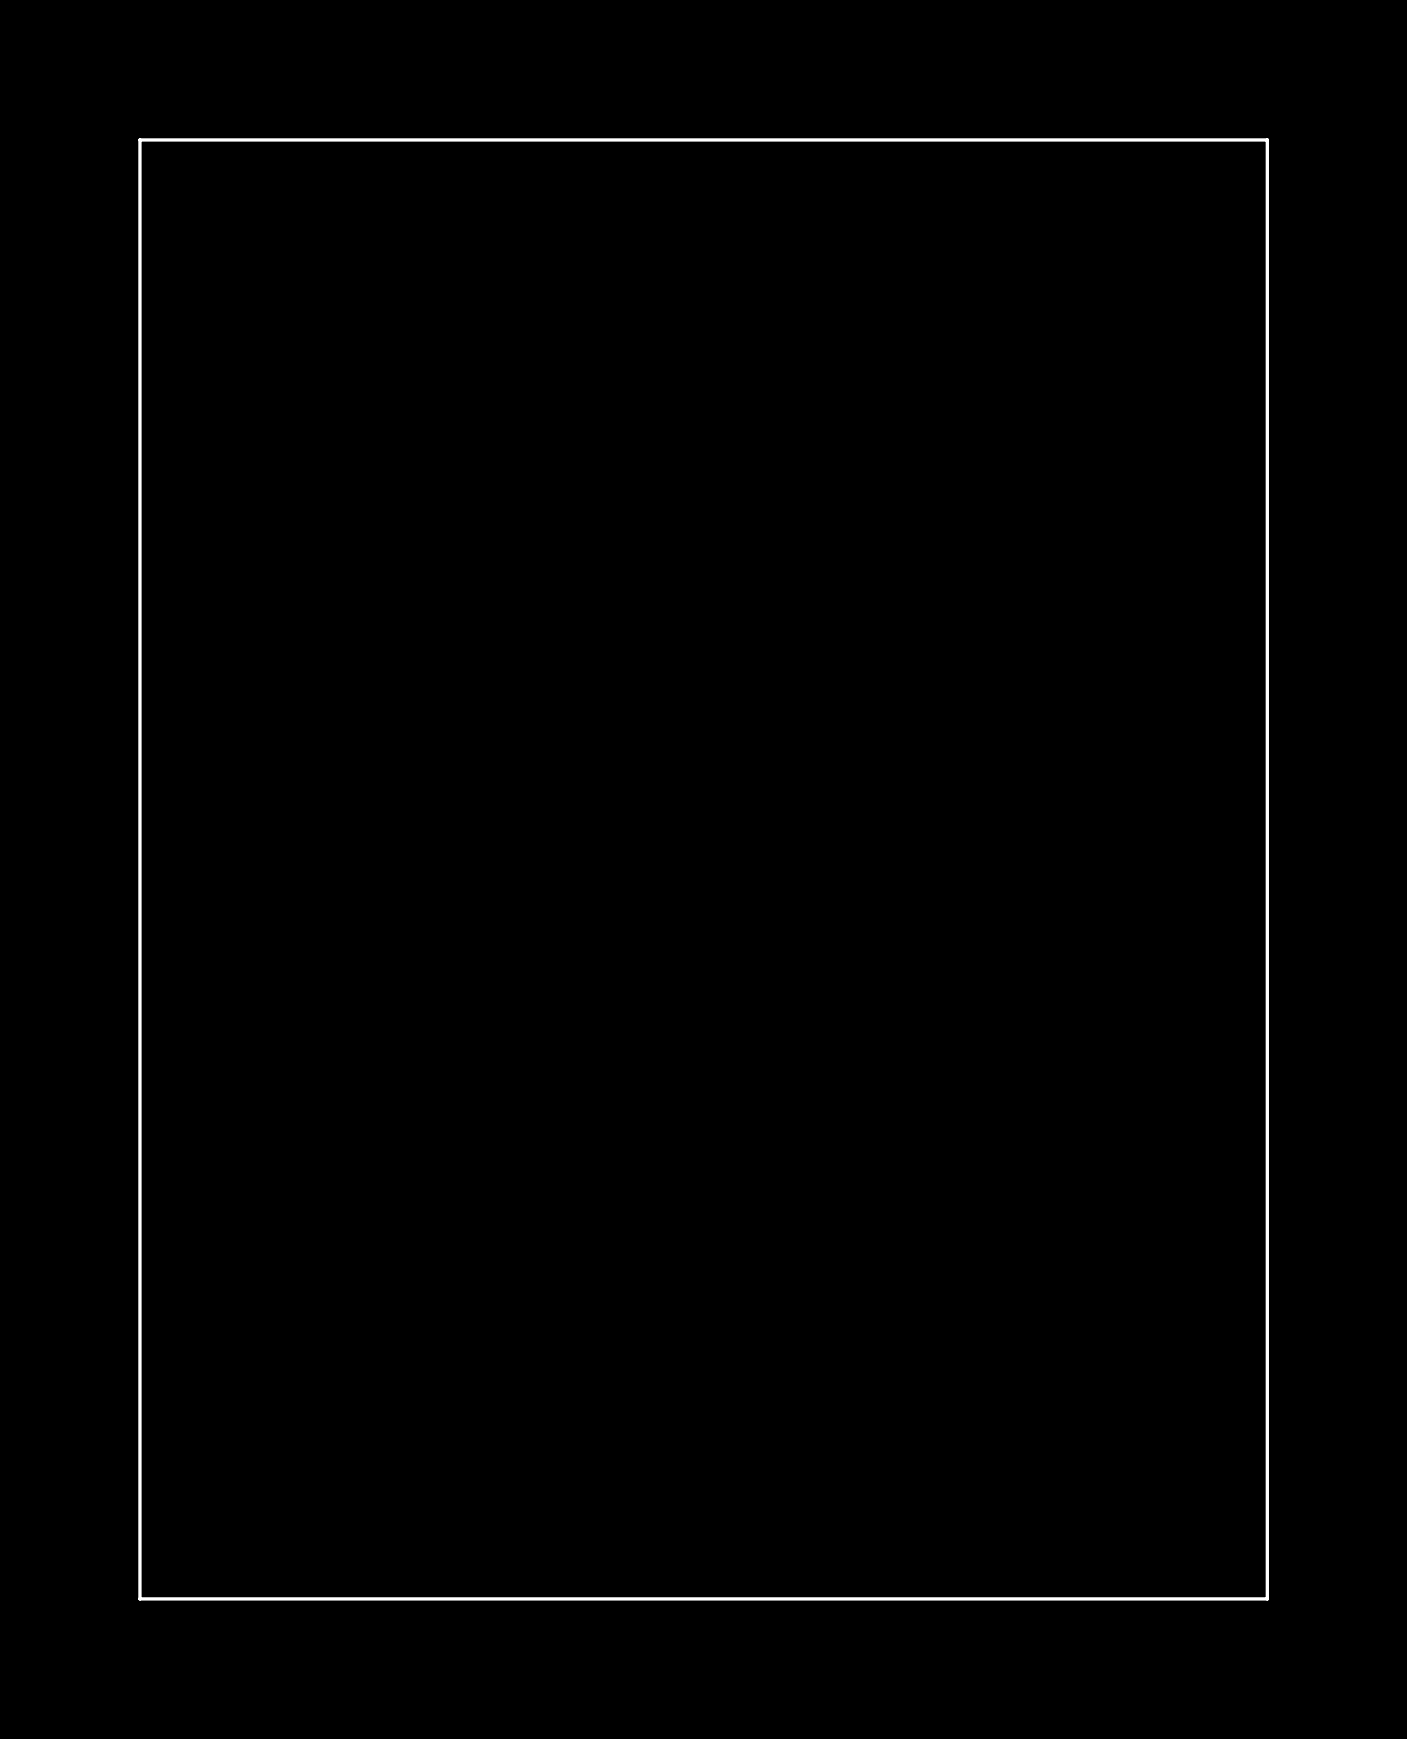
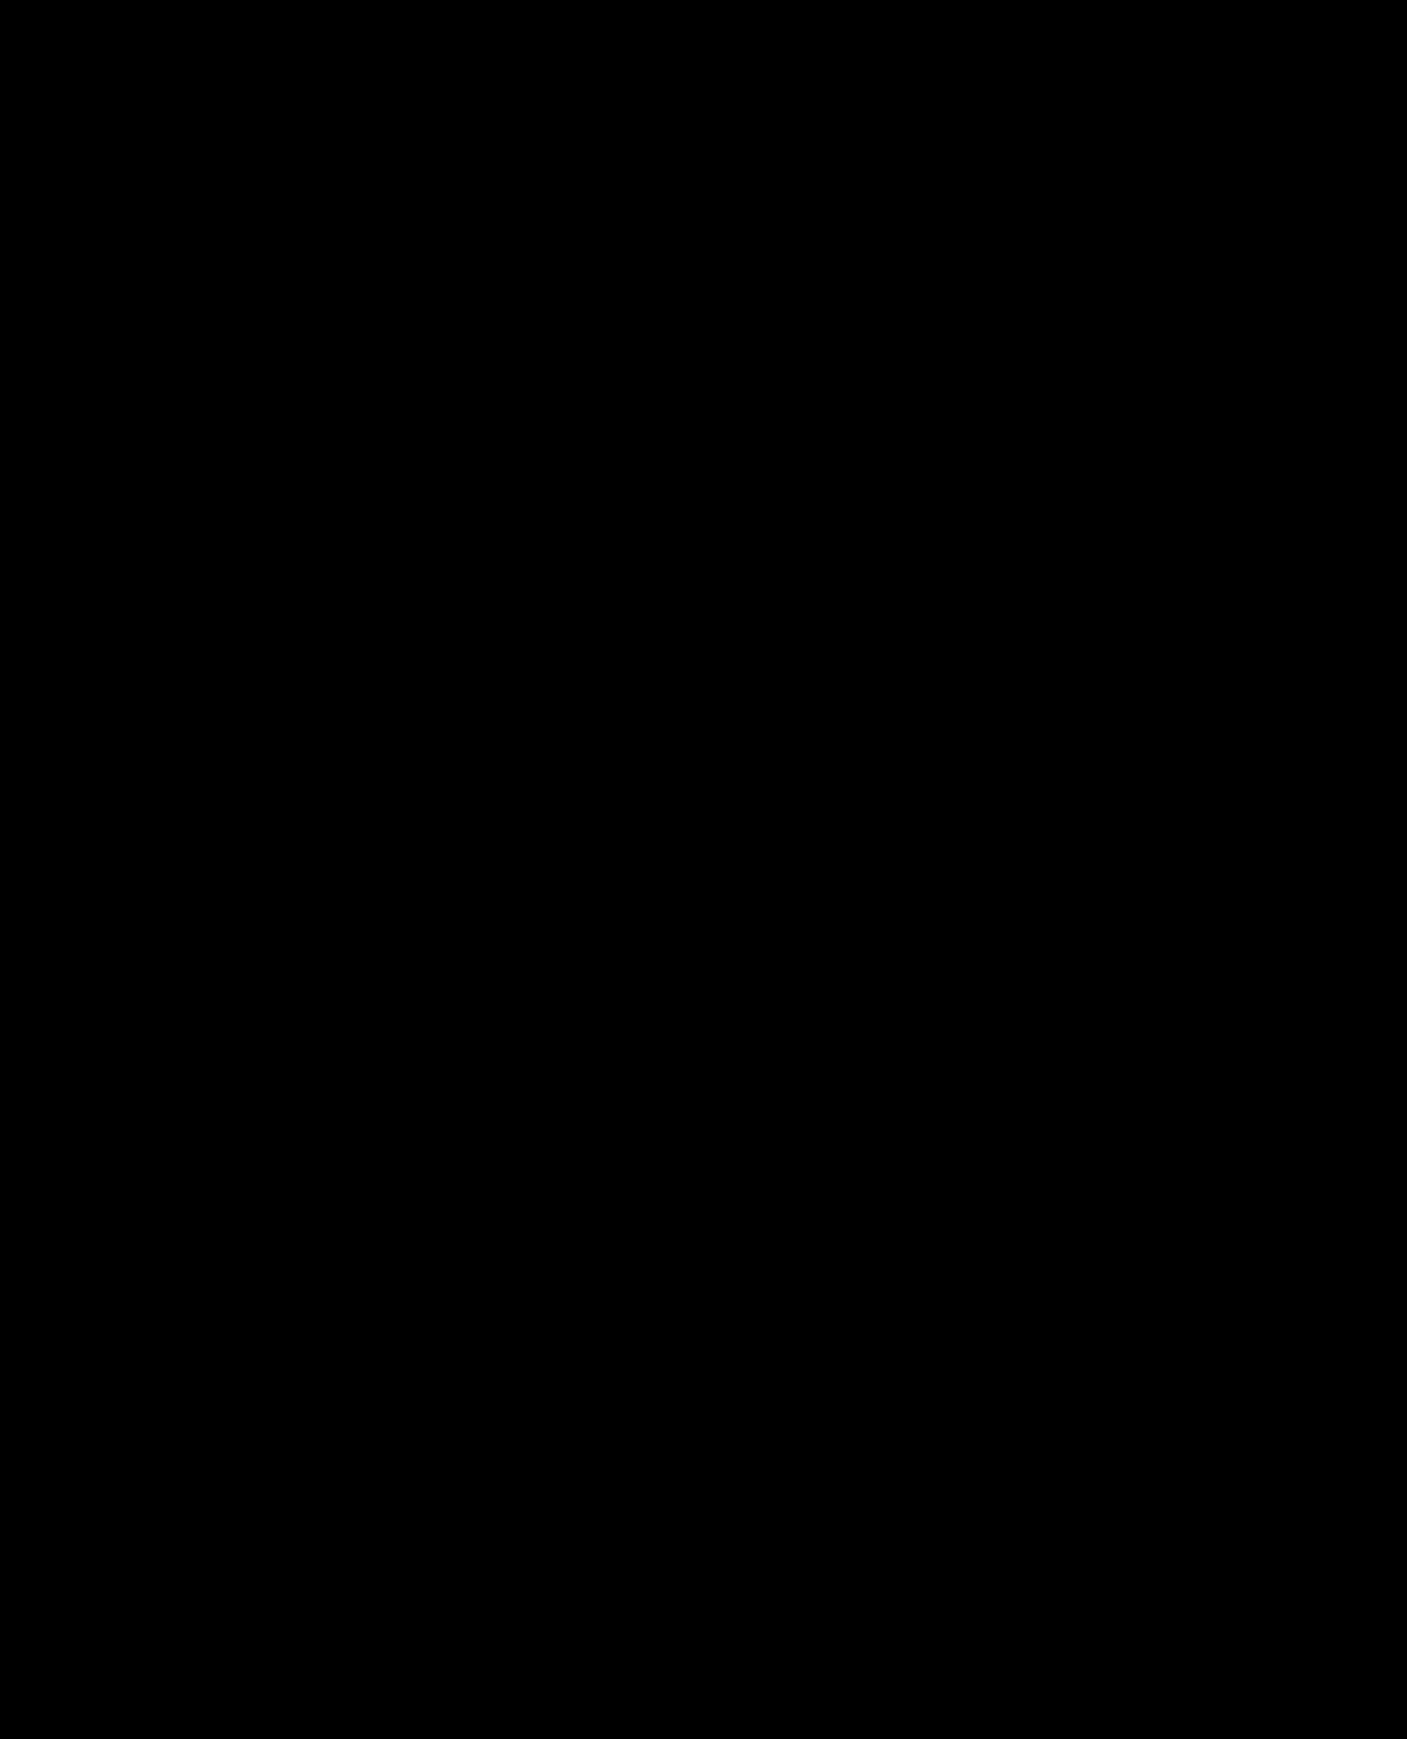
board edge: (1267, 139) (139, 139) (139, 1598) (1267, 1598) (1267, 139) -> none

